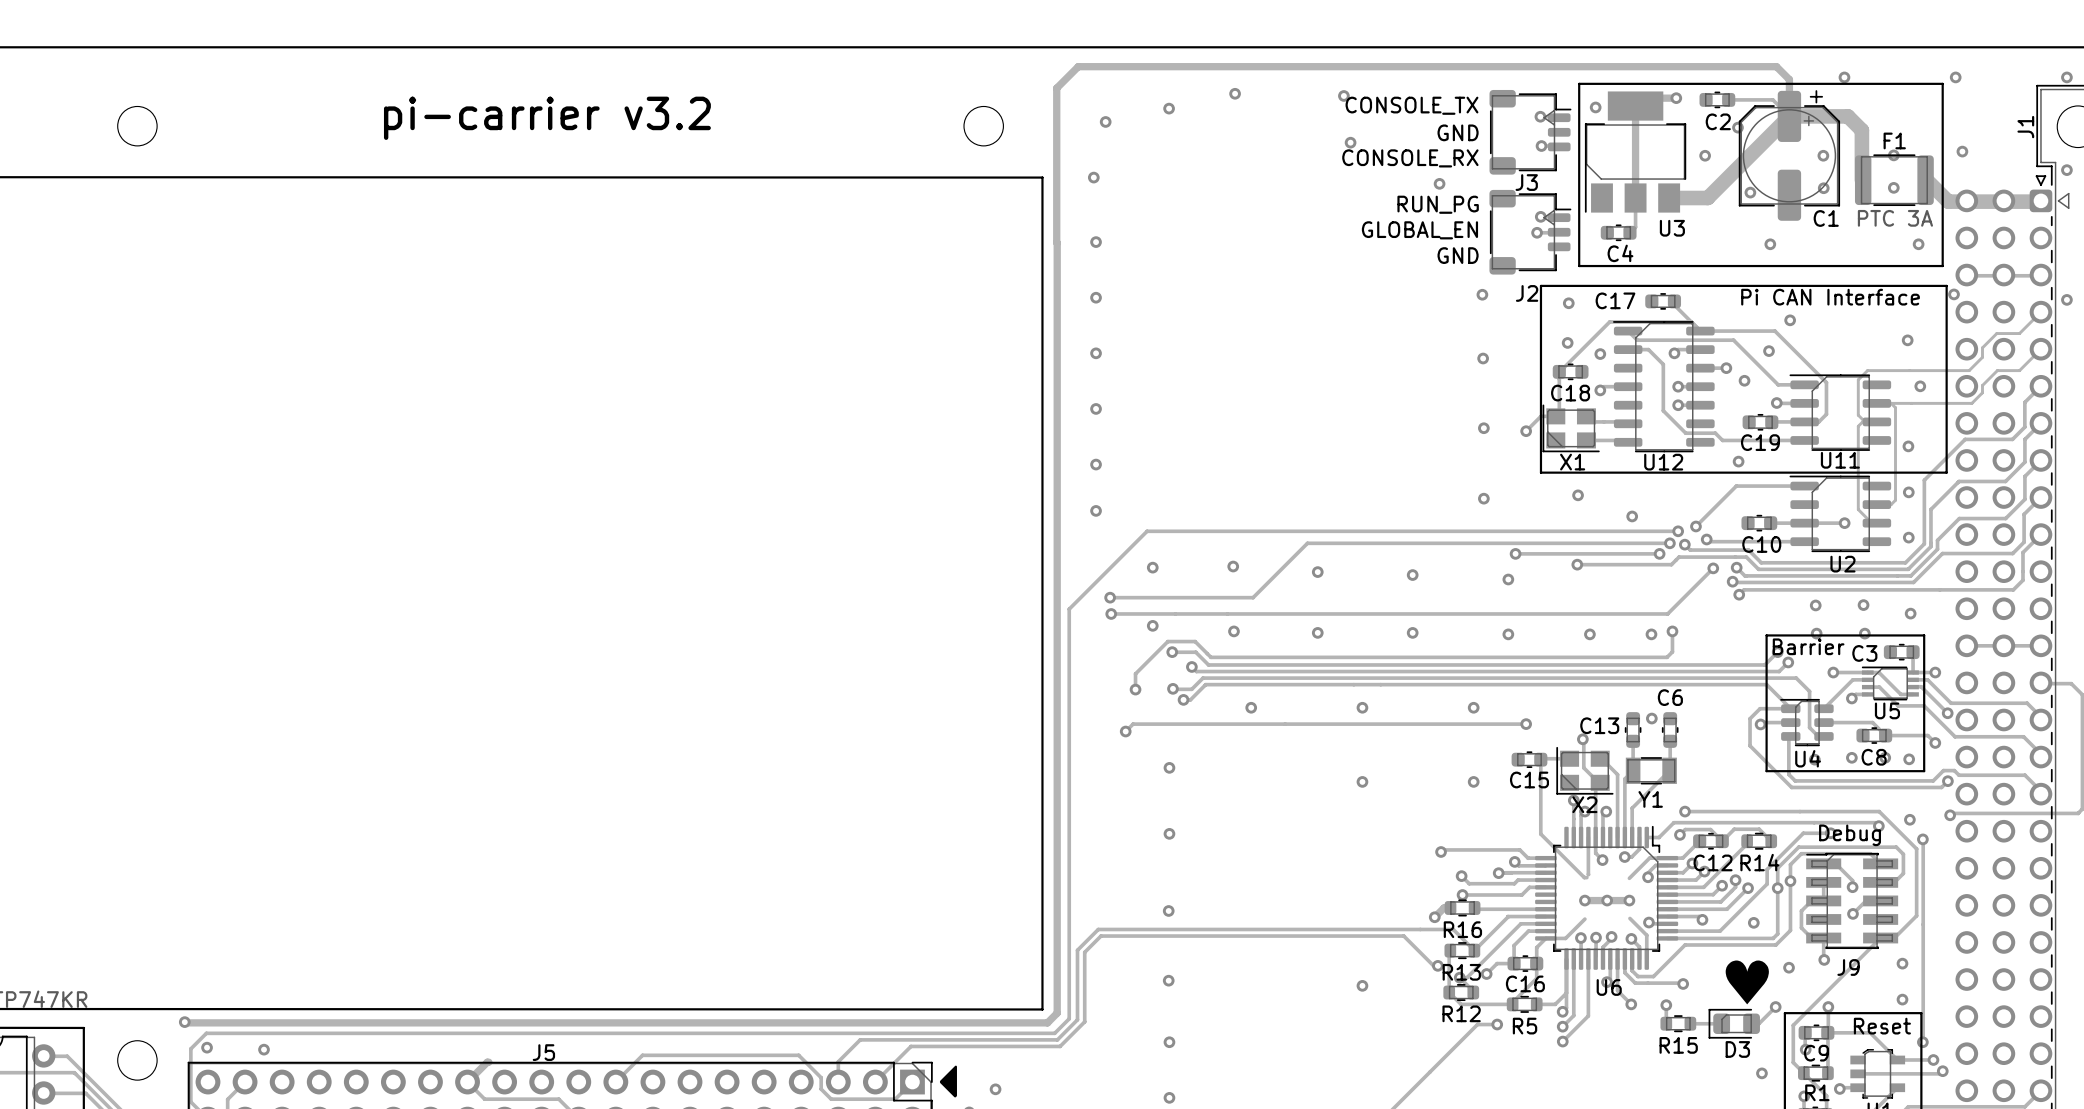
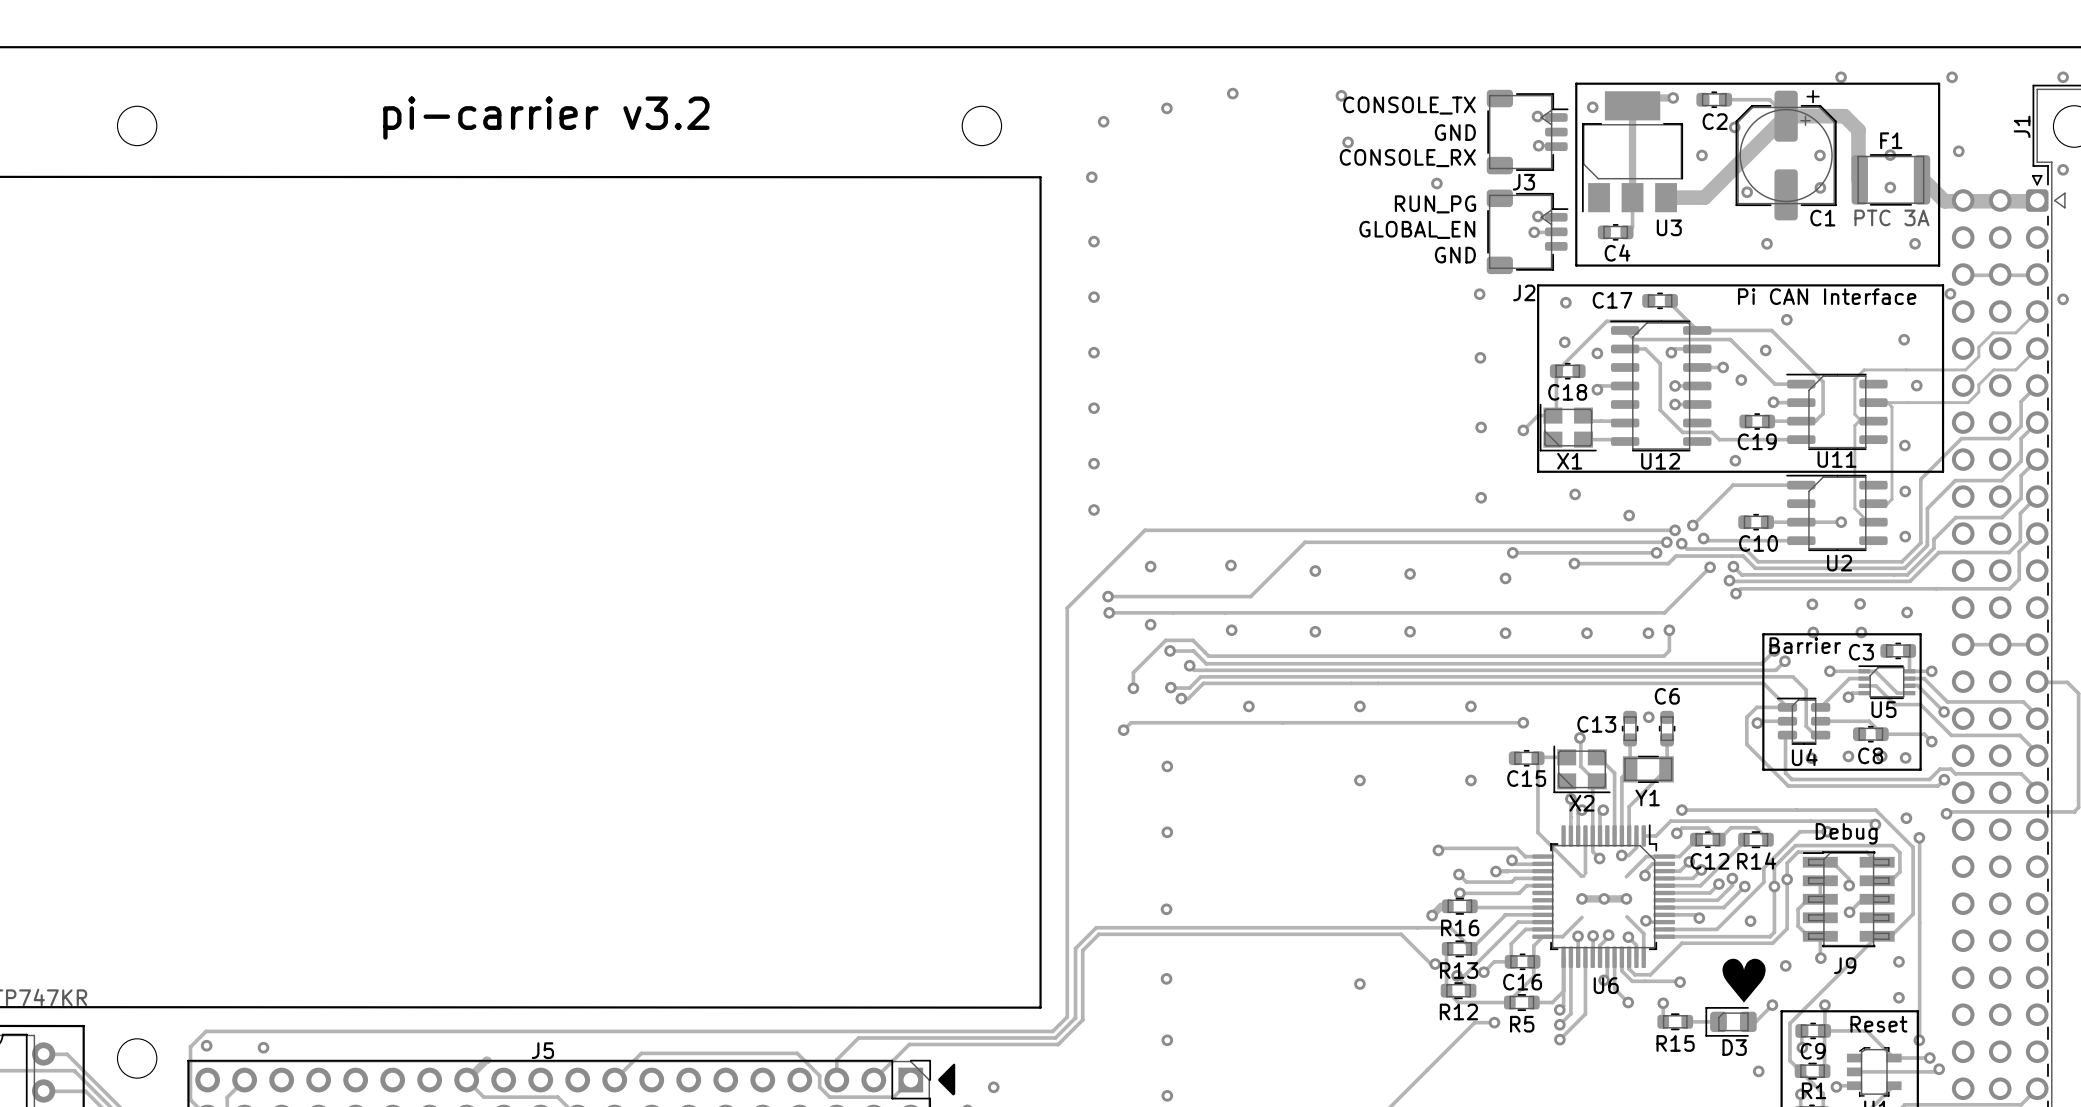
track: (1789, 116) (1789, 79) (1776, 66) (1078, 66) (1056, 88) (1057, 1013) (1047, 1022) (187, 1022) -> none
via: (184, 1022) -> none

